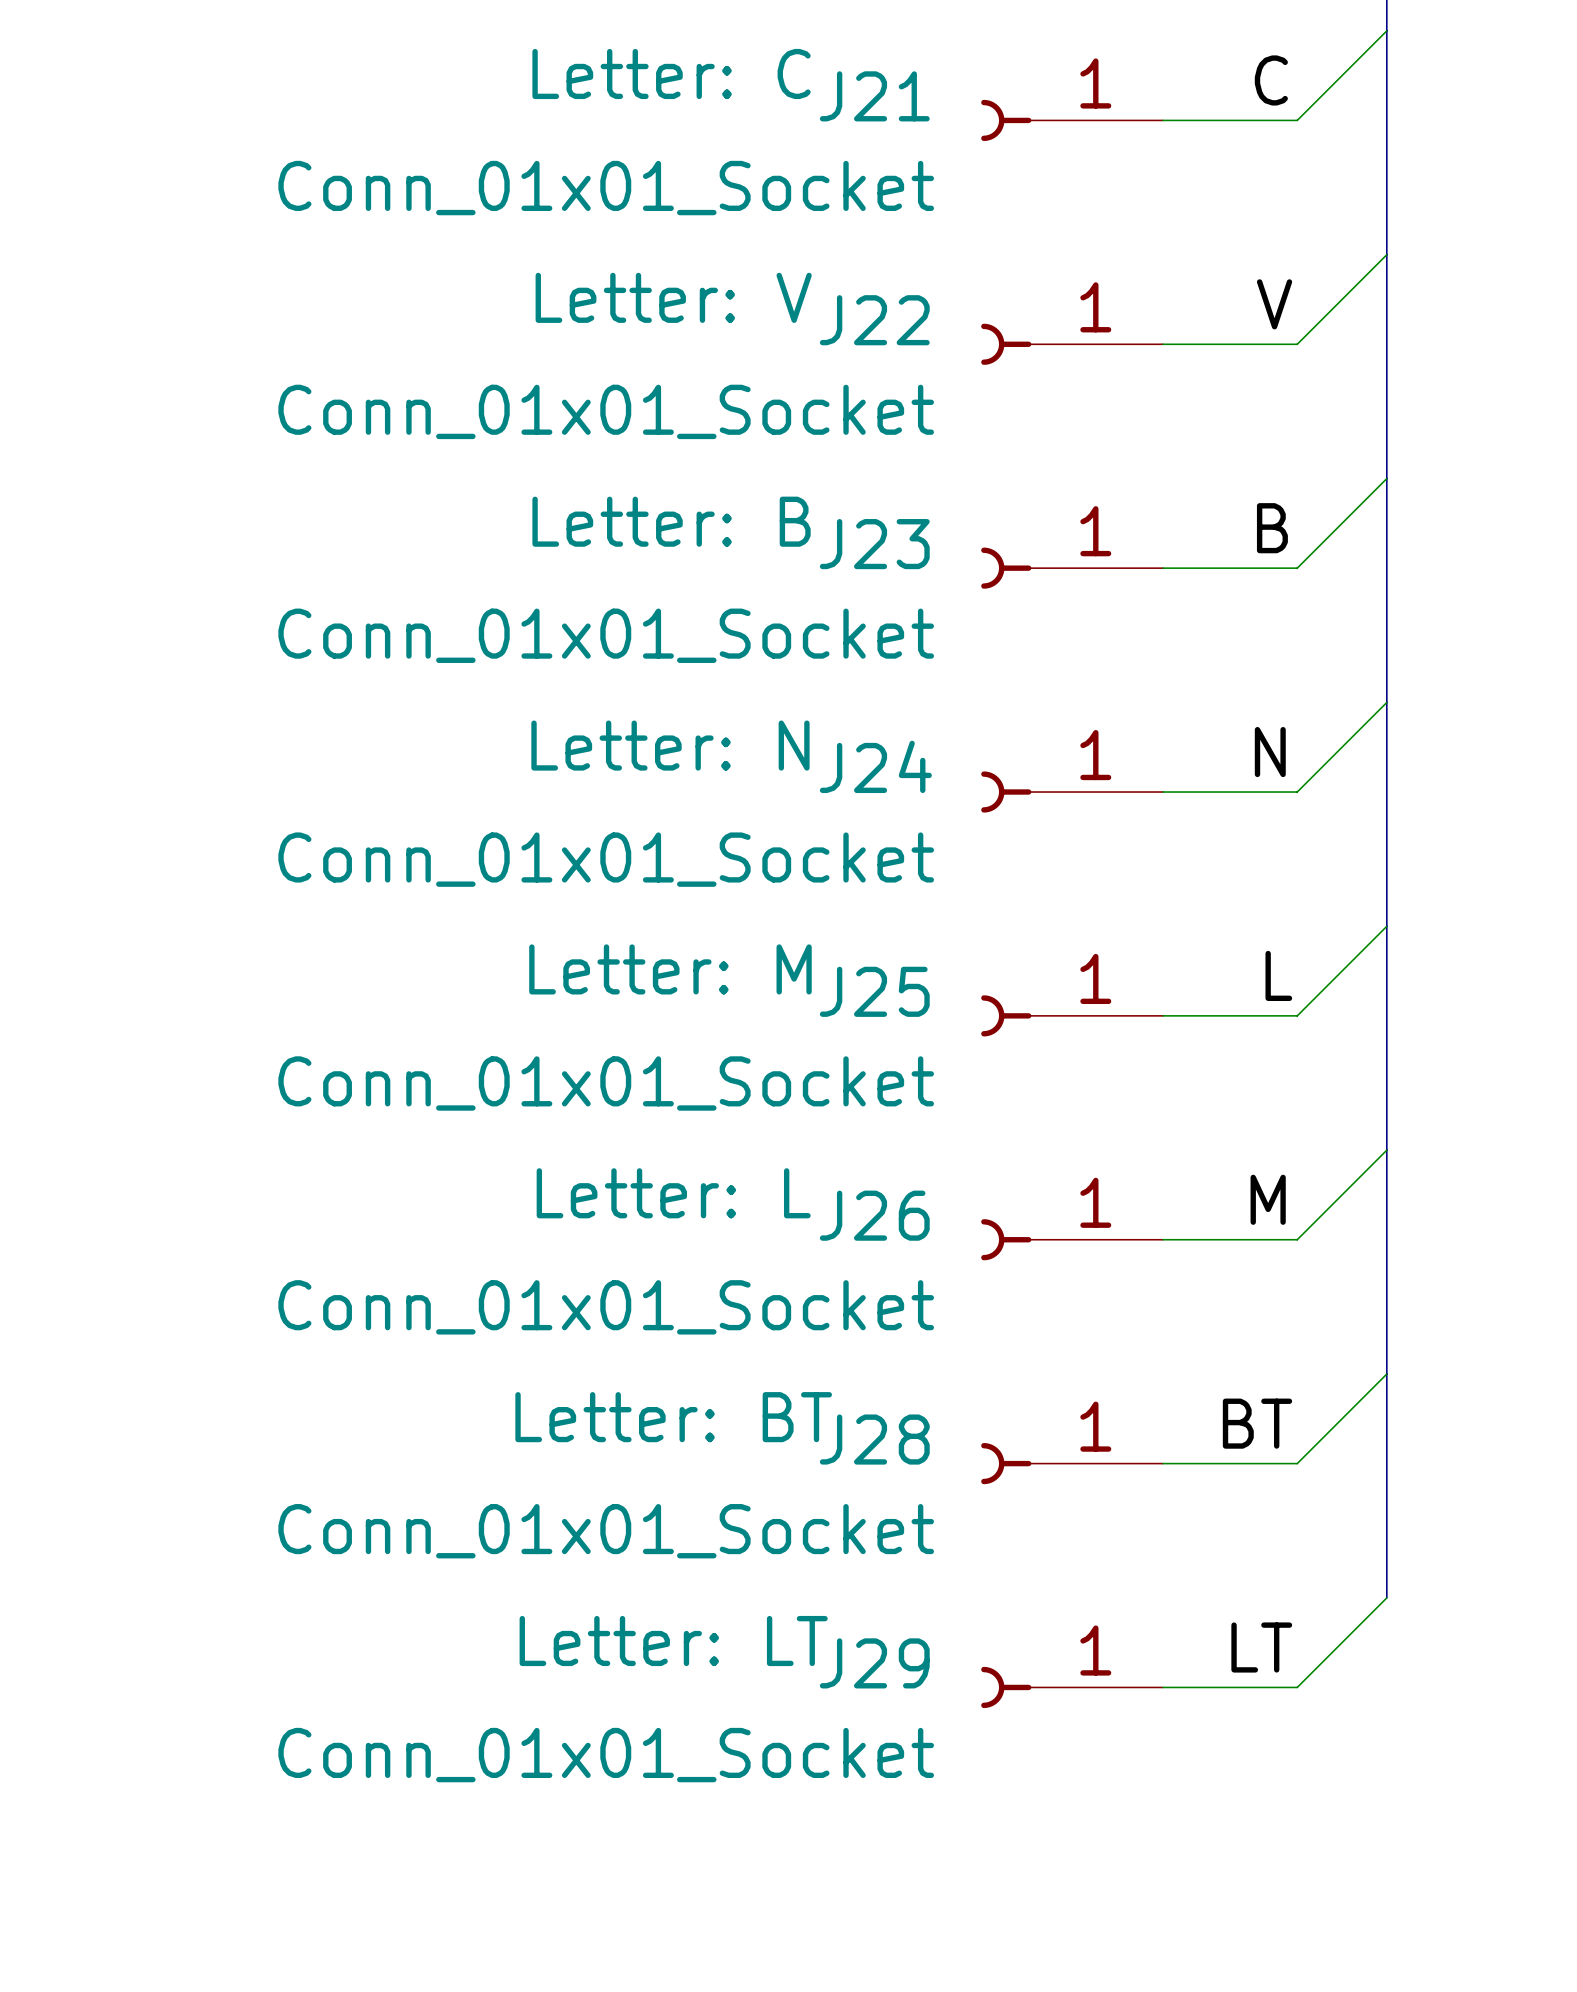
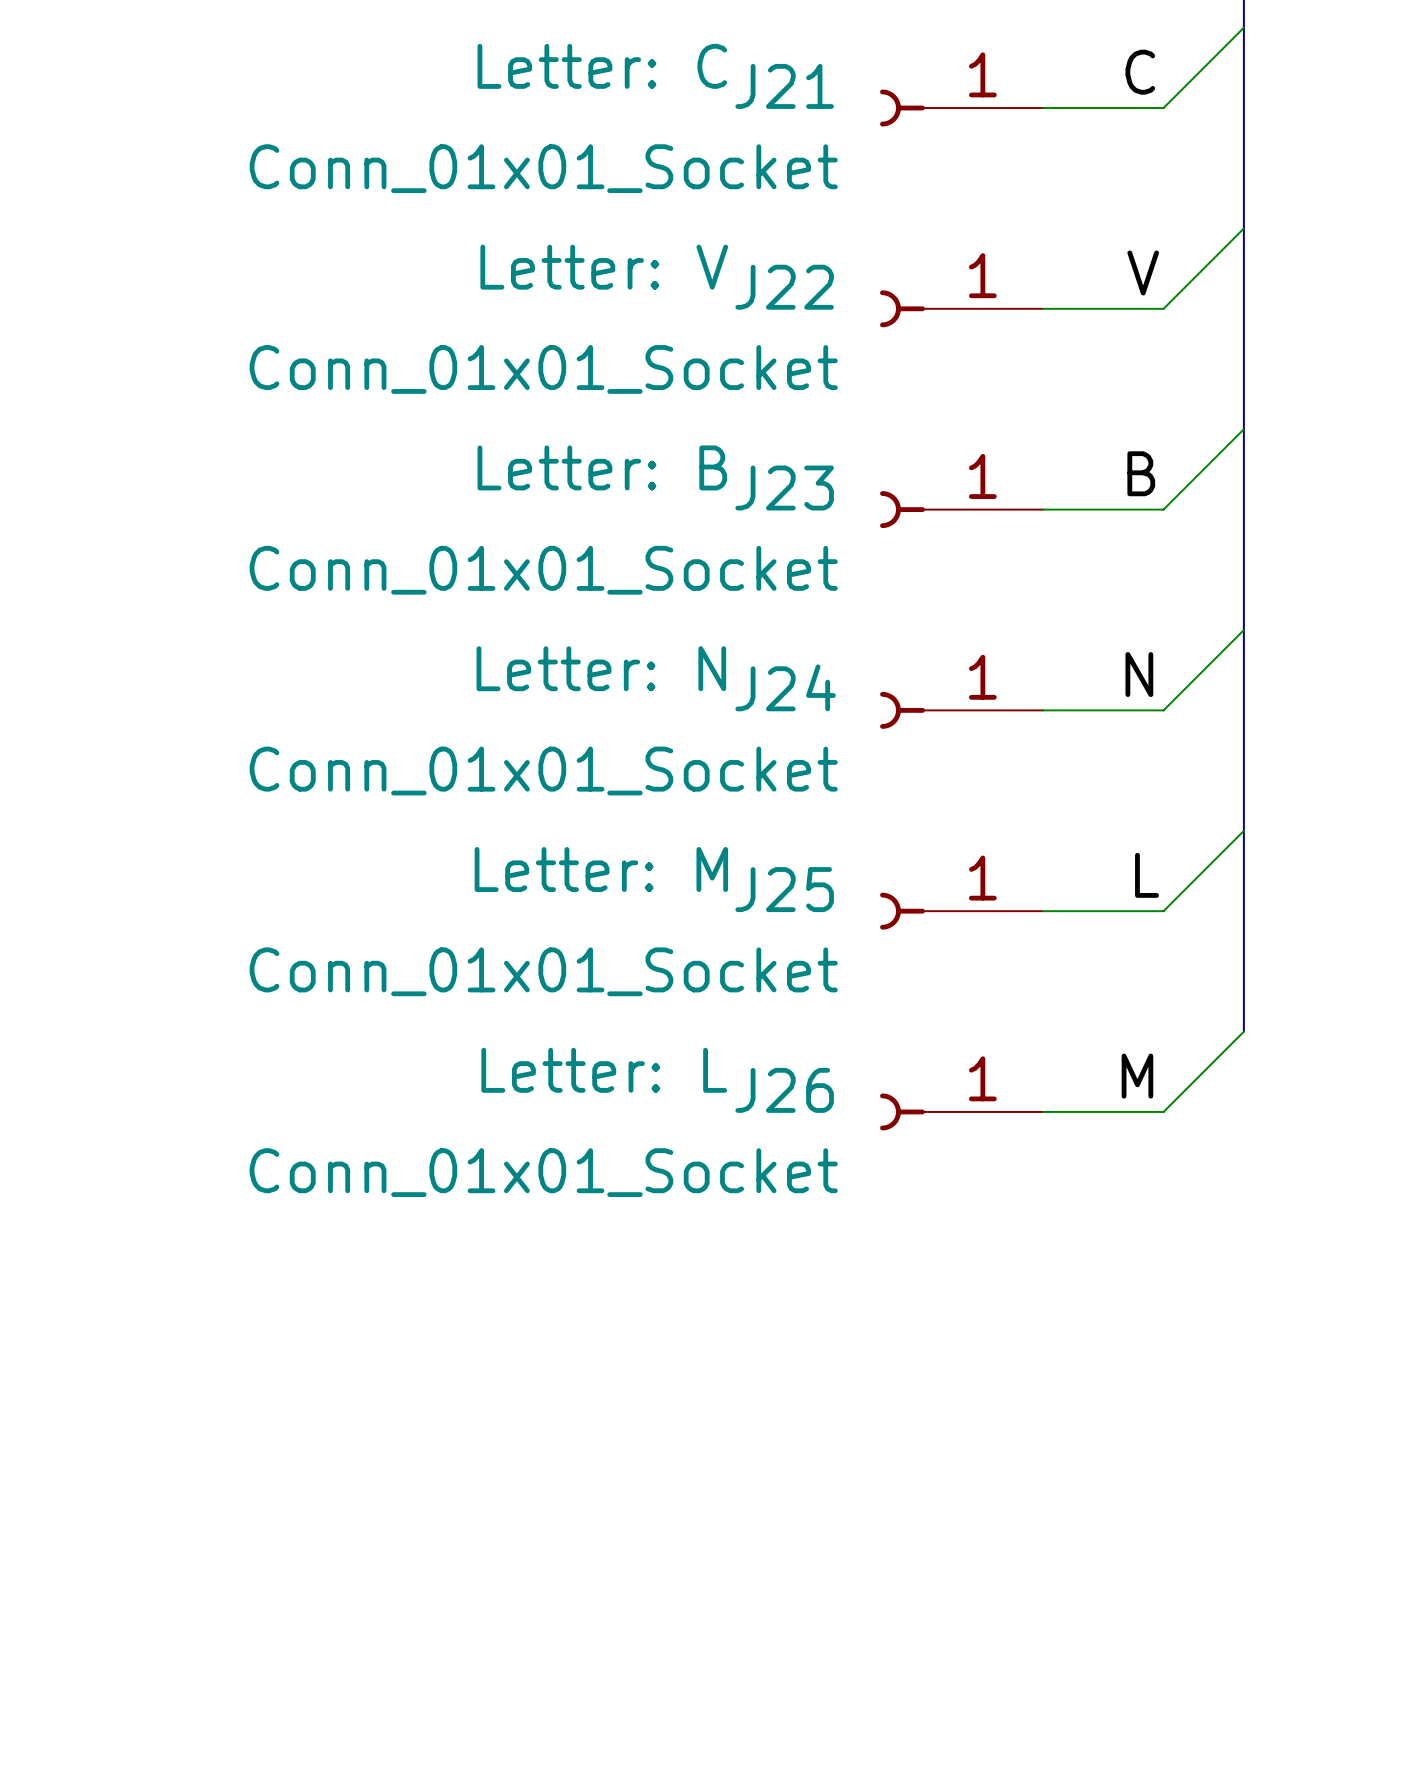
bus: (1386, 1150) (1386, 1597) -> none
wire: (1386, 1374) (1297, 1463) (1162, 1463) -> none
label: BT (1257, 1423) -> none
J28: Conn_01x01_Socket (1072, 1463) -> none
wire: (1386, 1597) (1297, 1687) (1162, 1687) -> none
label: LT (1261, 1647) -> none
J29: Conn_01x01_Socket (1072, 1687) -> none

